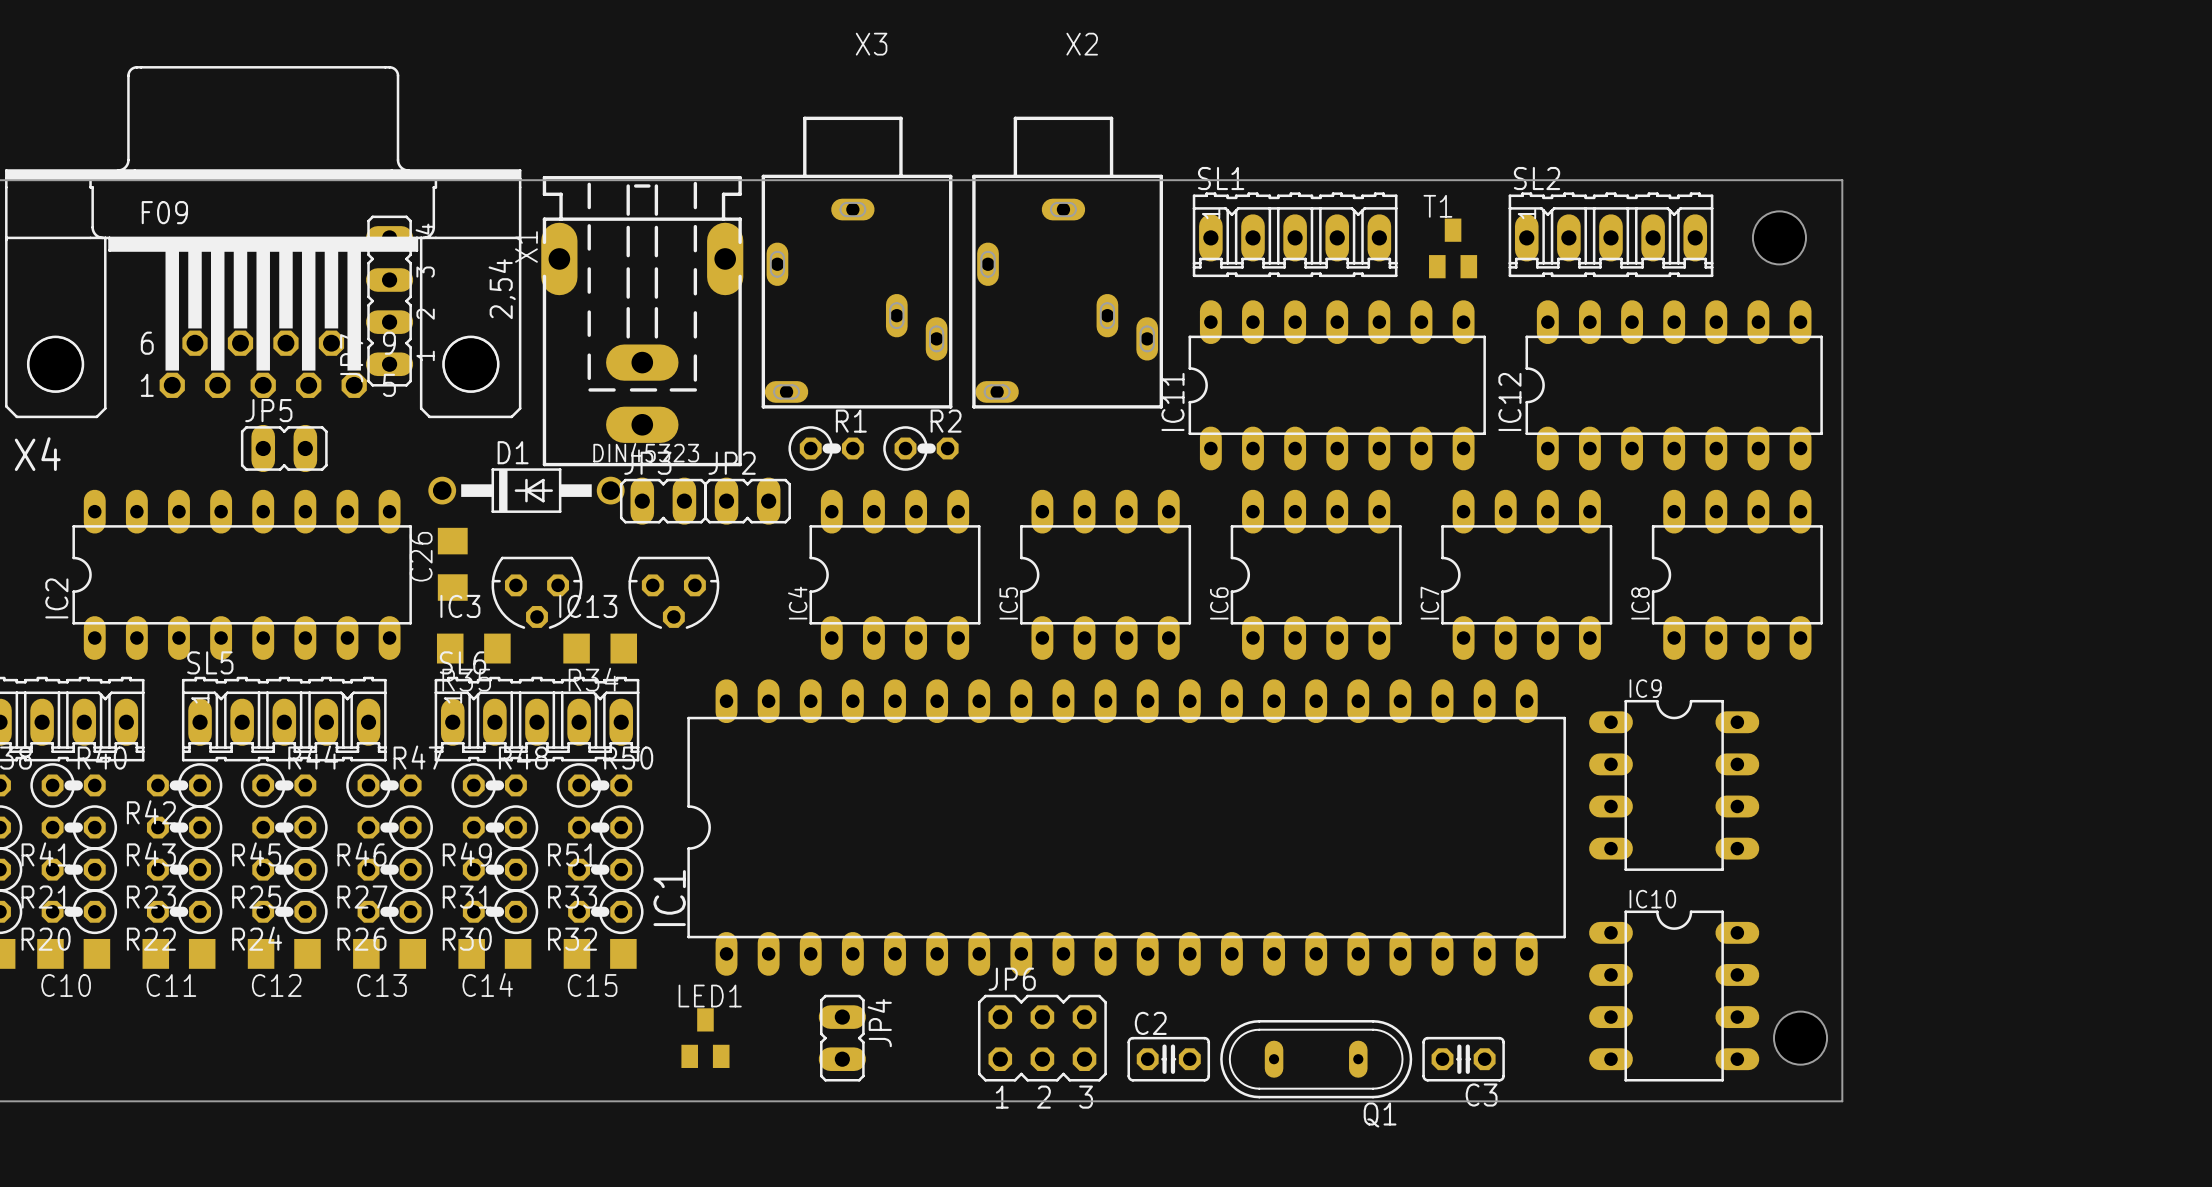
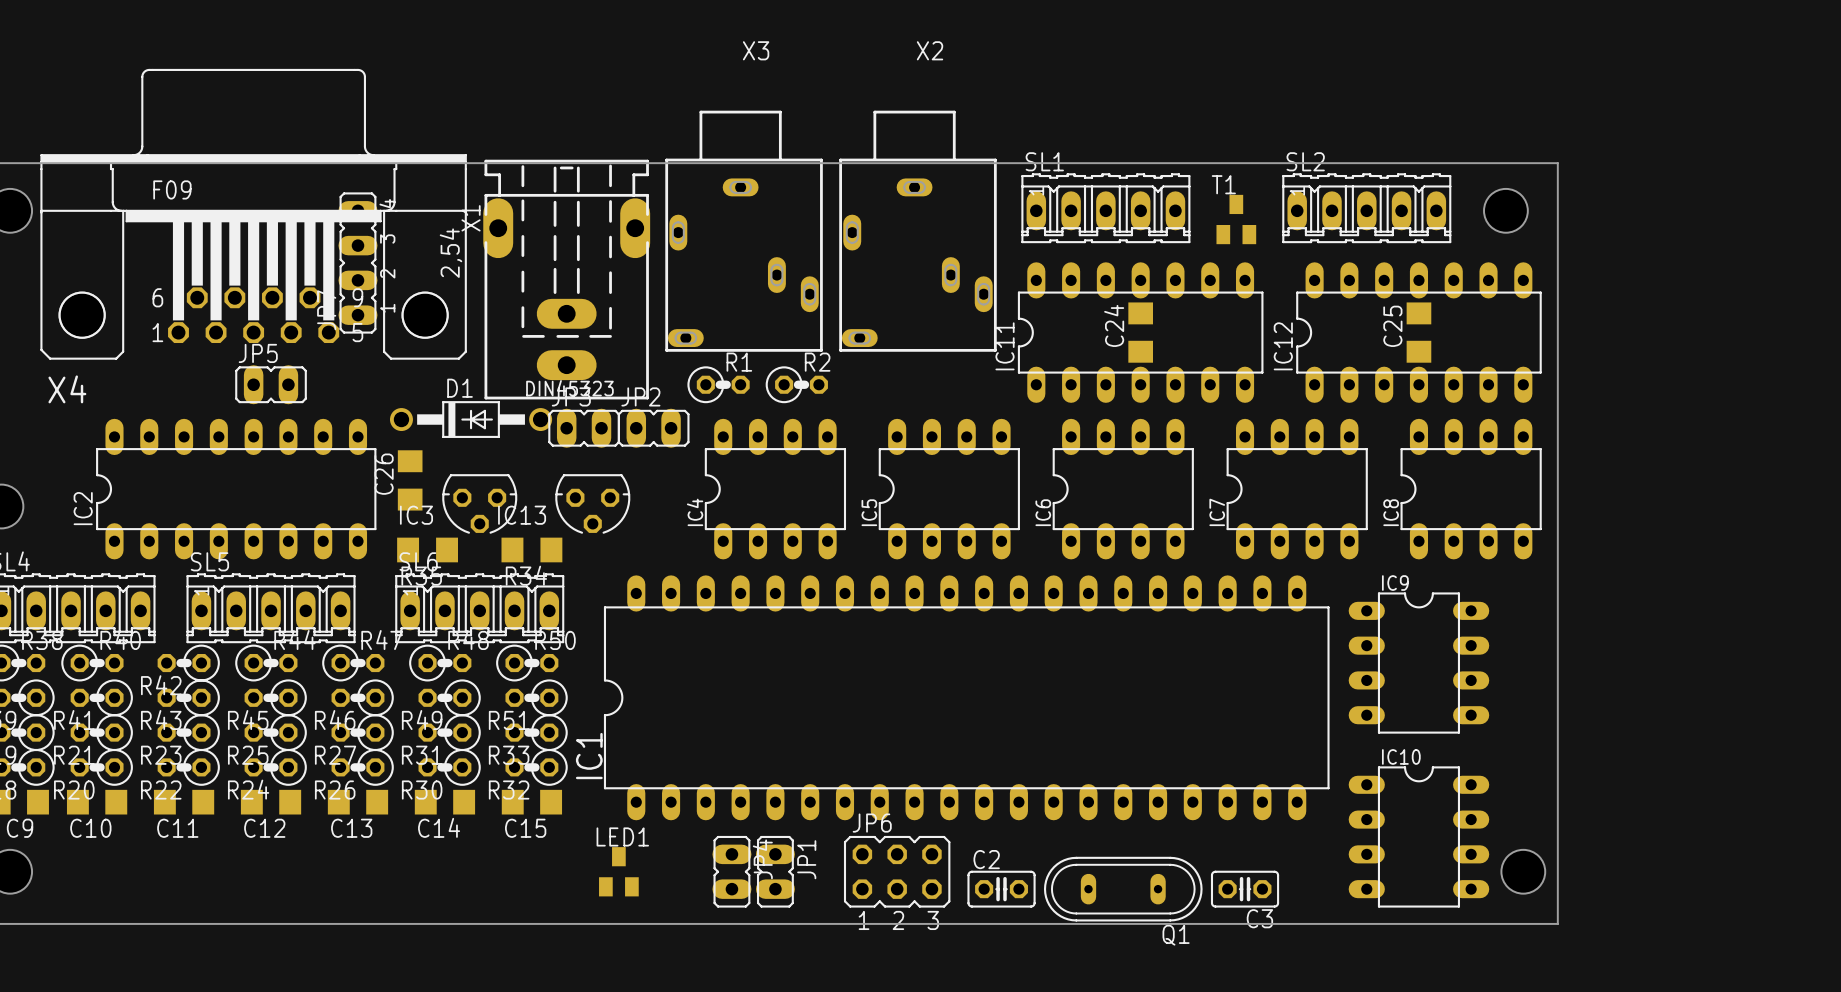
C24: none -> (1140, 332)
C25: none -> (1418, 332)
JP1: none -> (775, 871)

